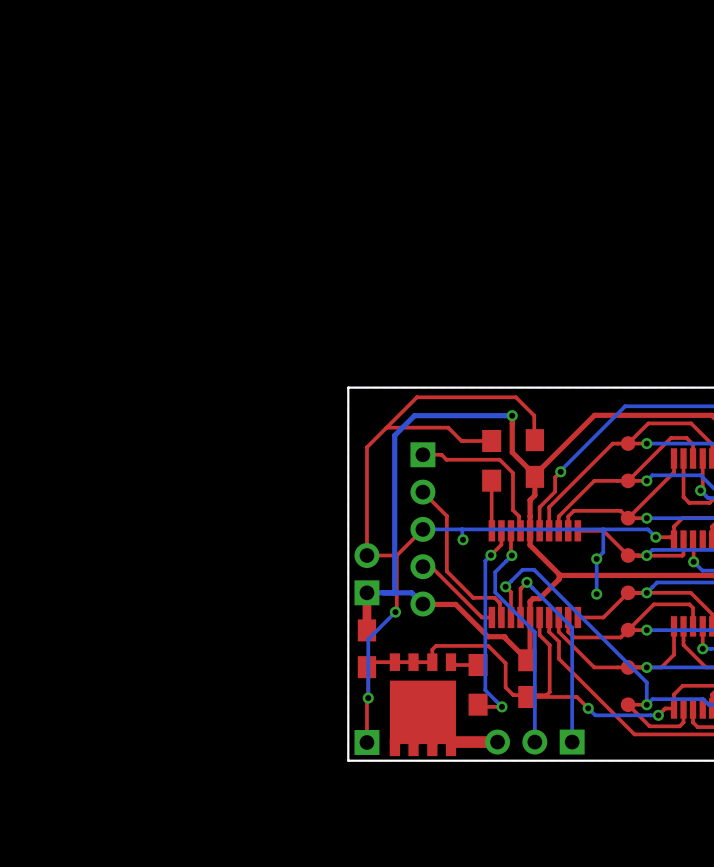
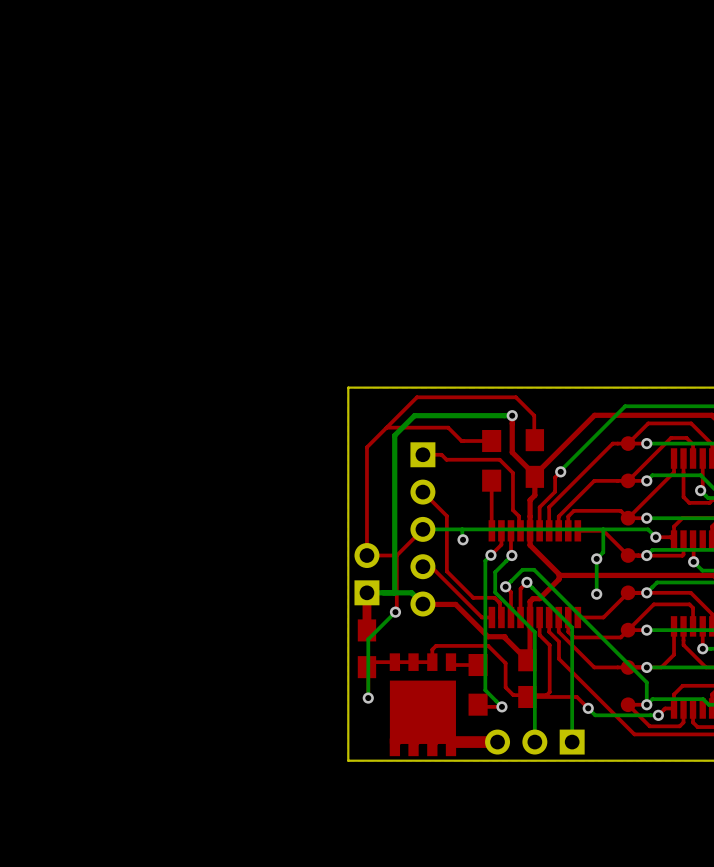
top track: (368, 698) (366, 742) -> none
part: (366, 742) -> none

